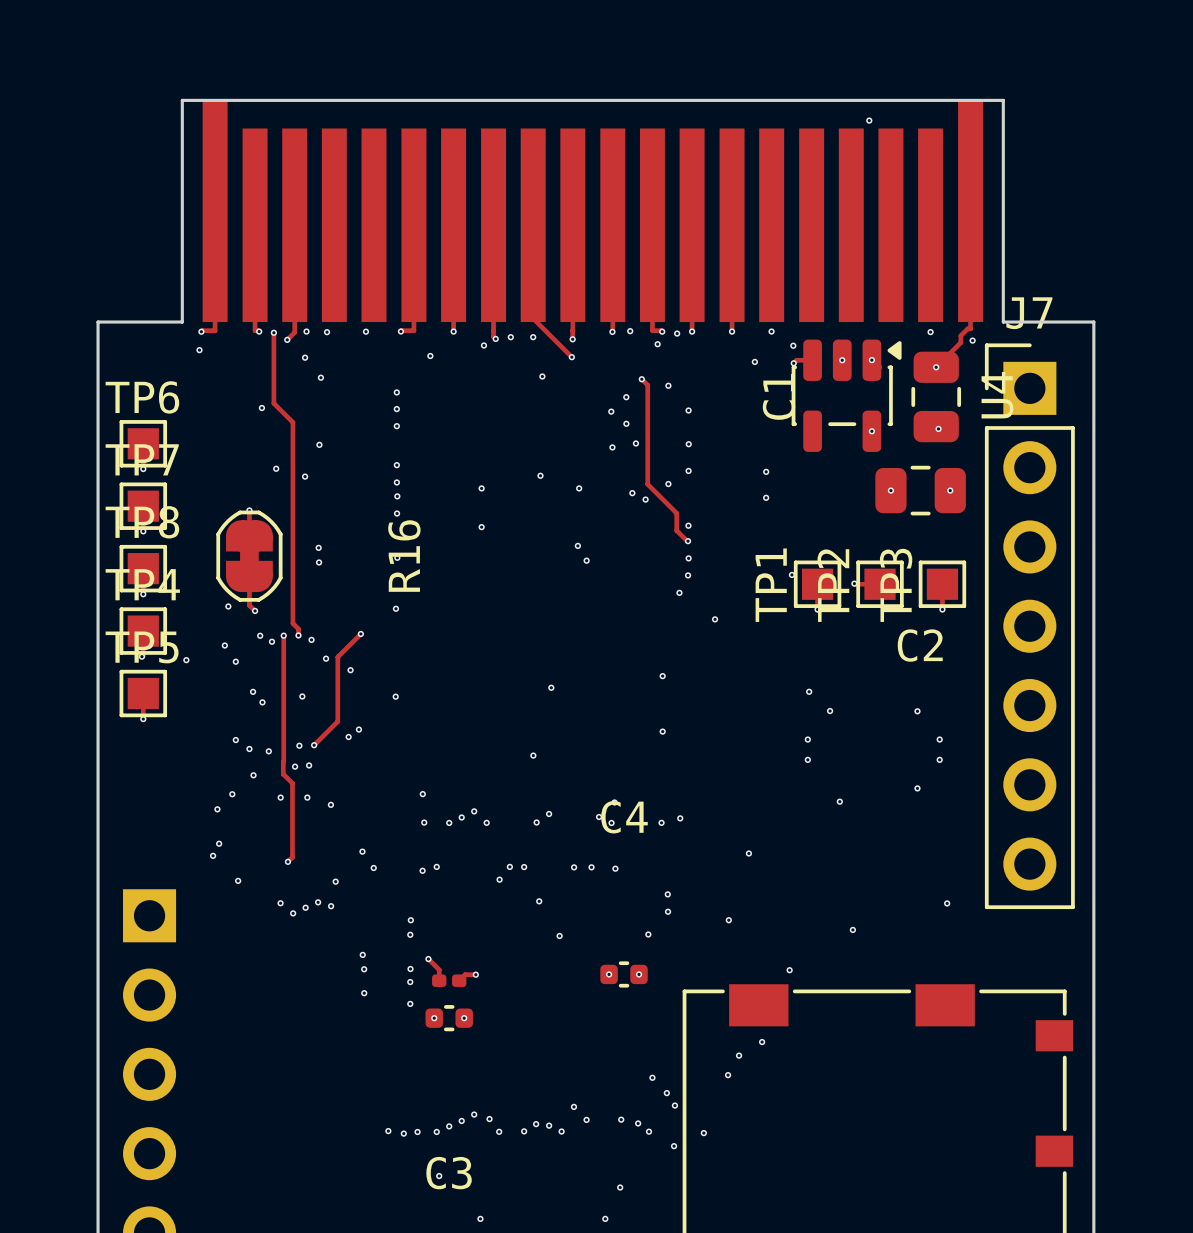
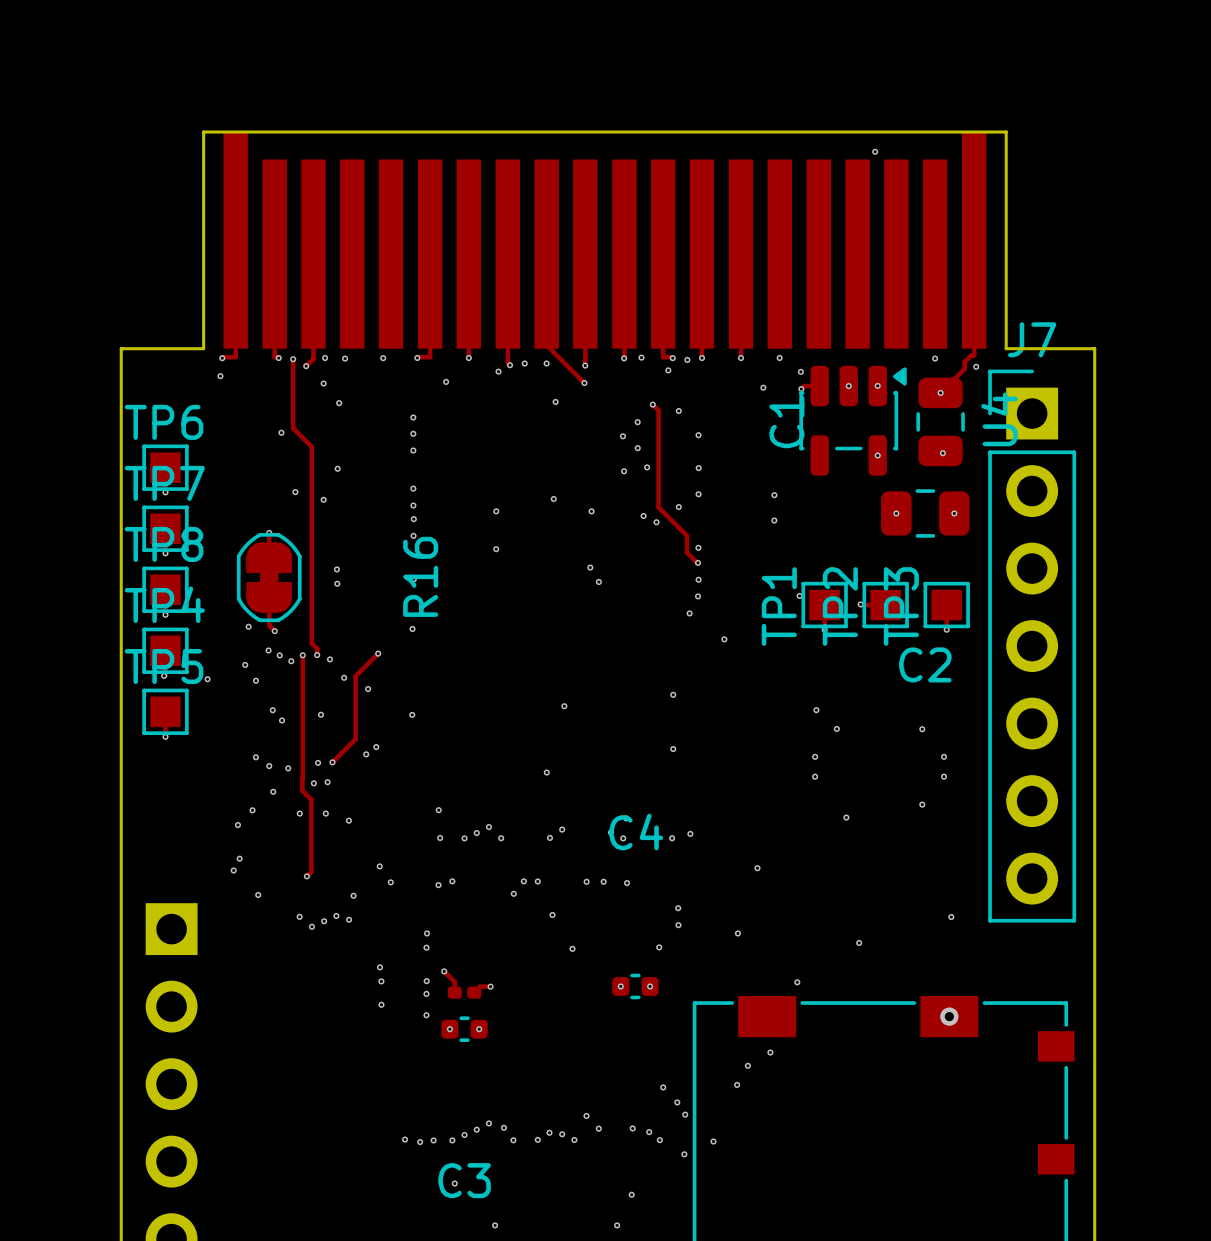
via: none -> (268, 650)
via: none -> (949, 1016)

